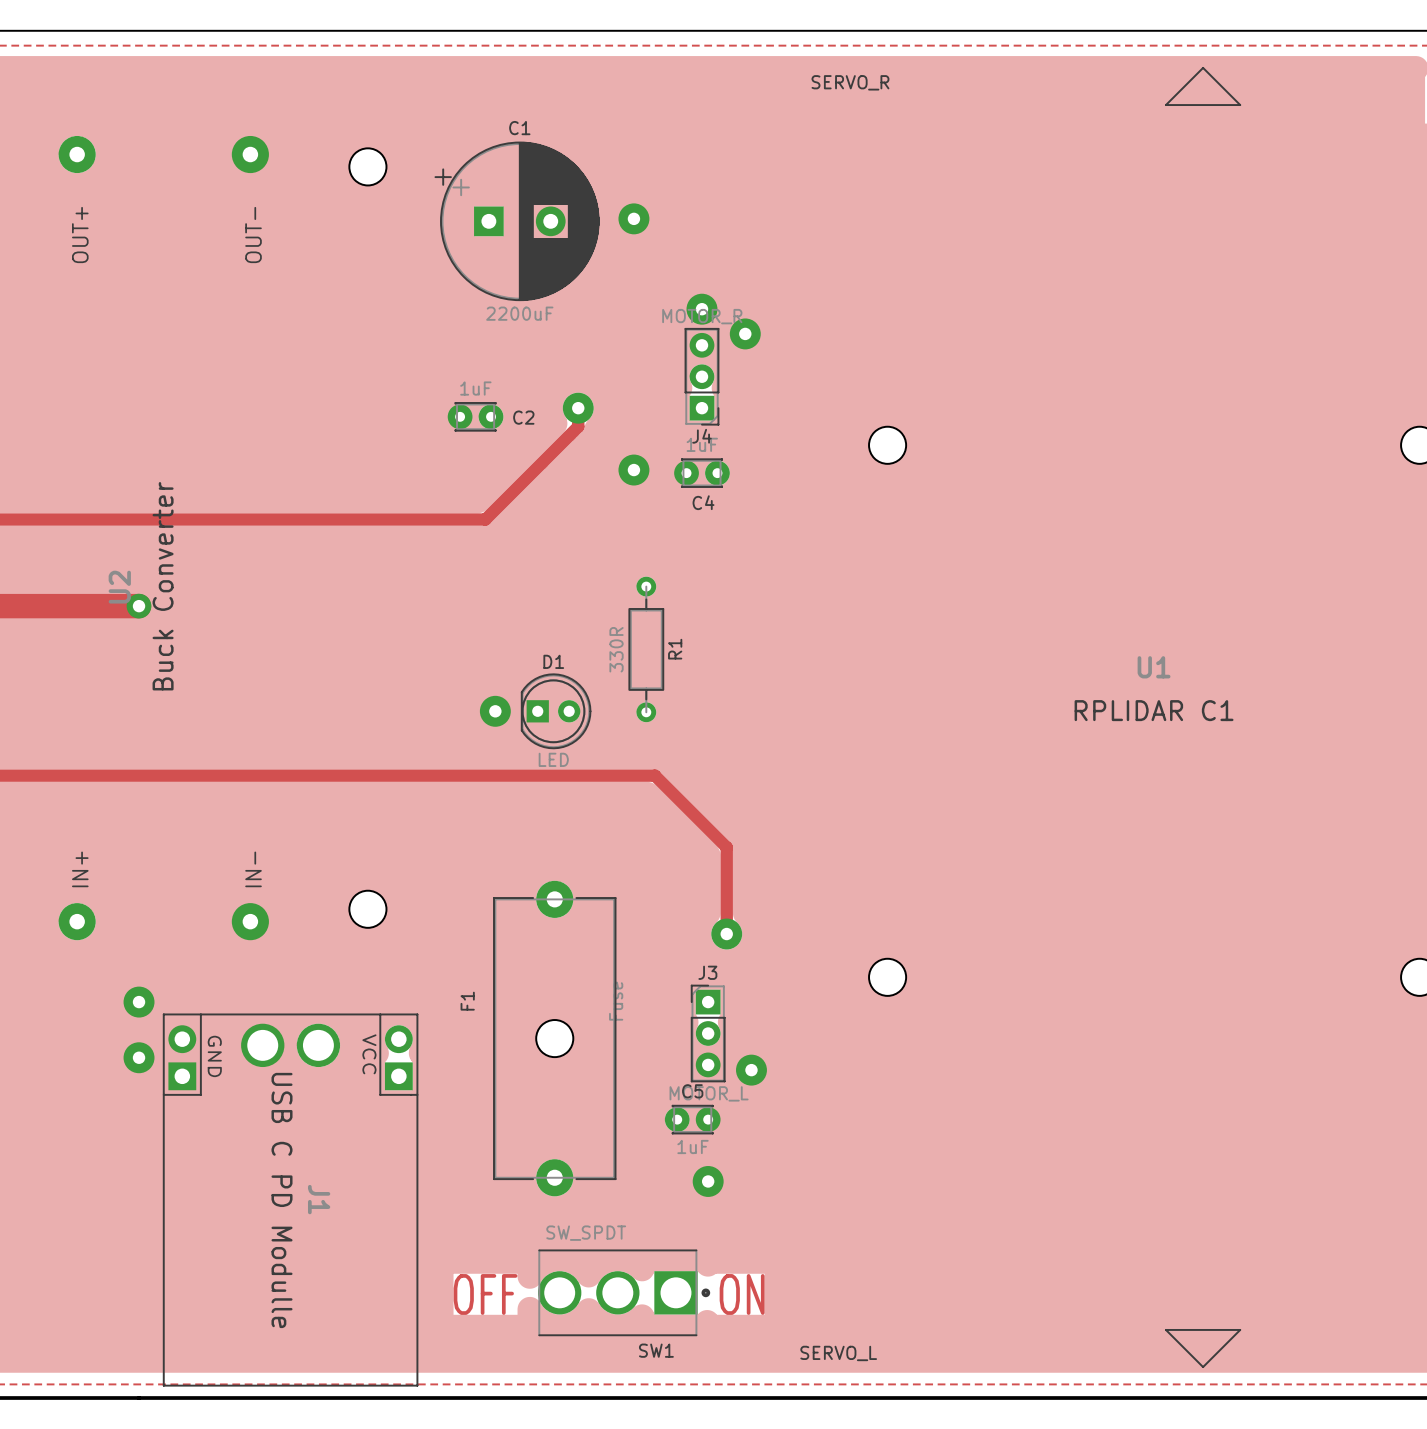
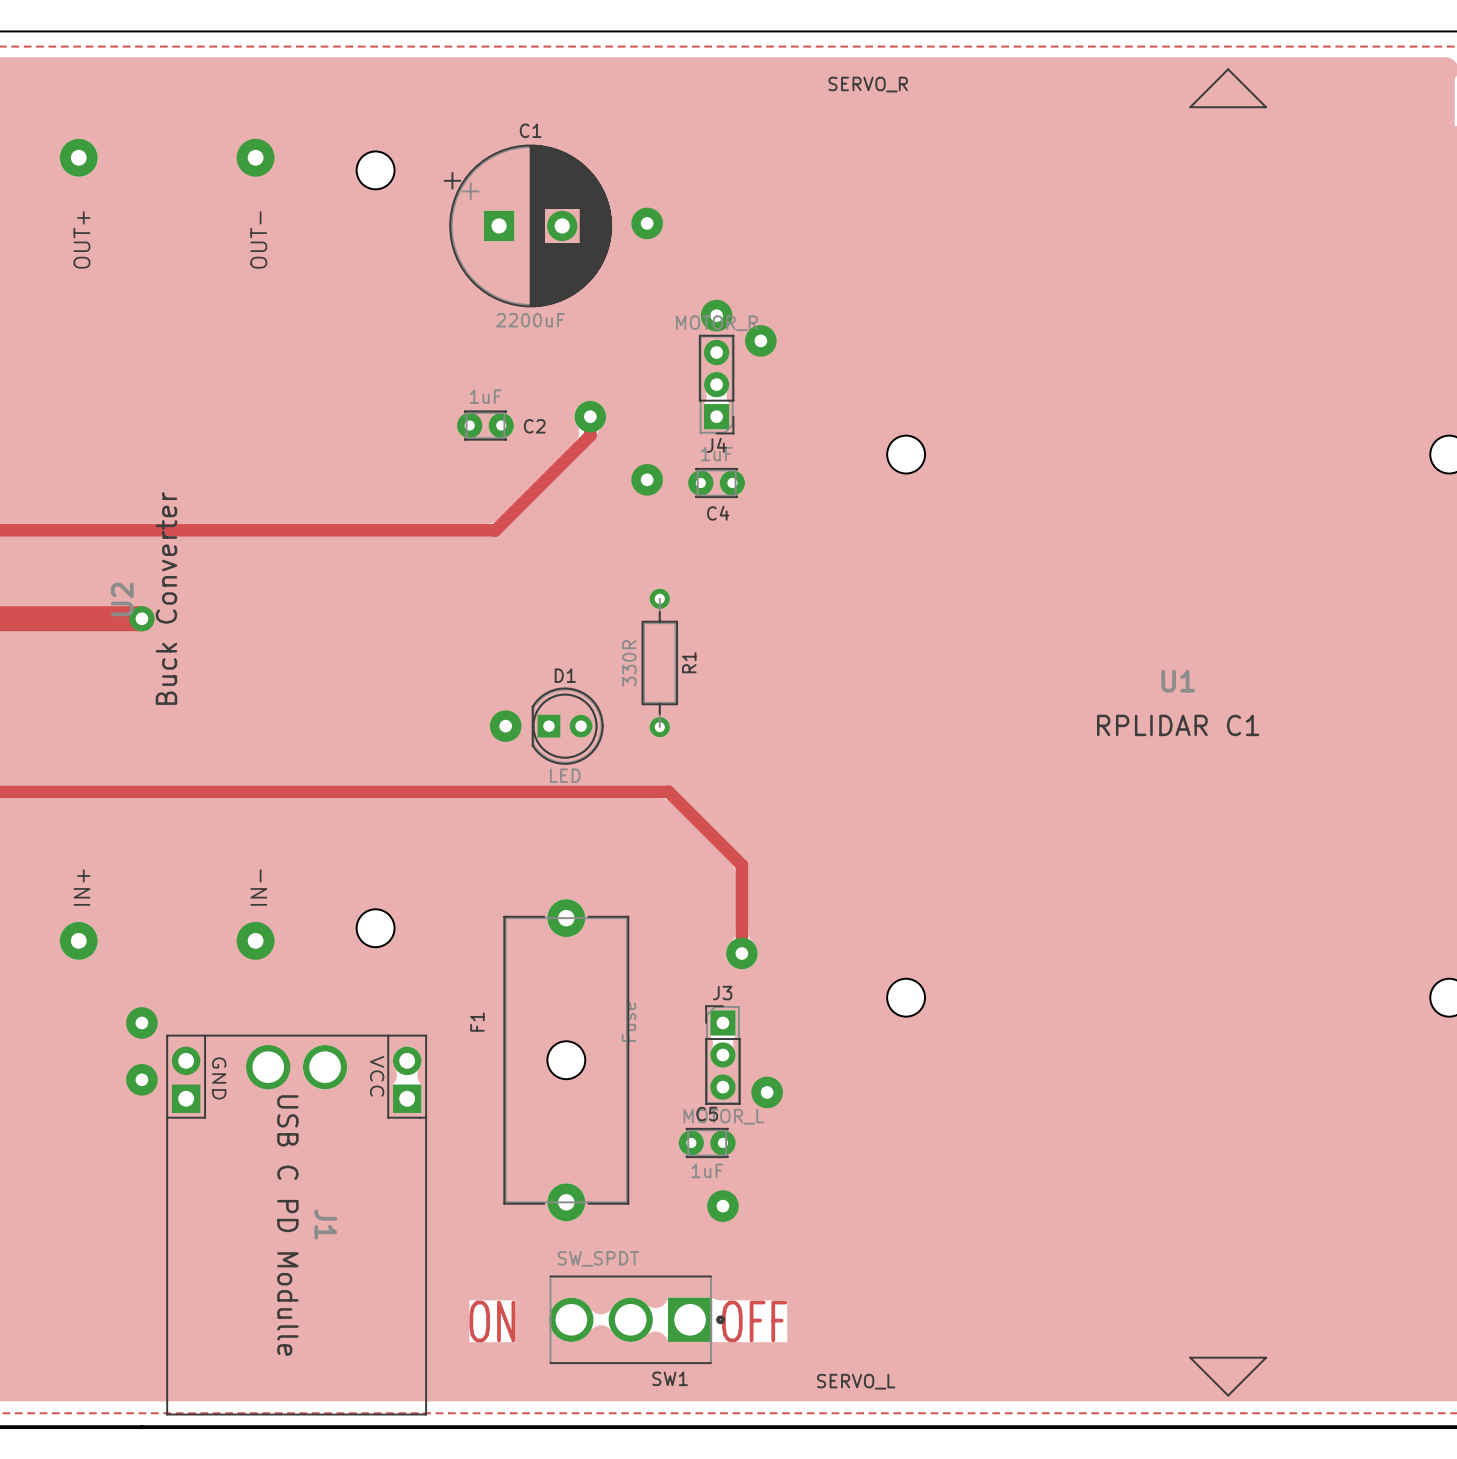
text position: OFF (485, 1294) -> OFF (754, 1321)
text position: ON (742, 1294) -> ON (492, 1321)

